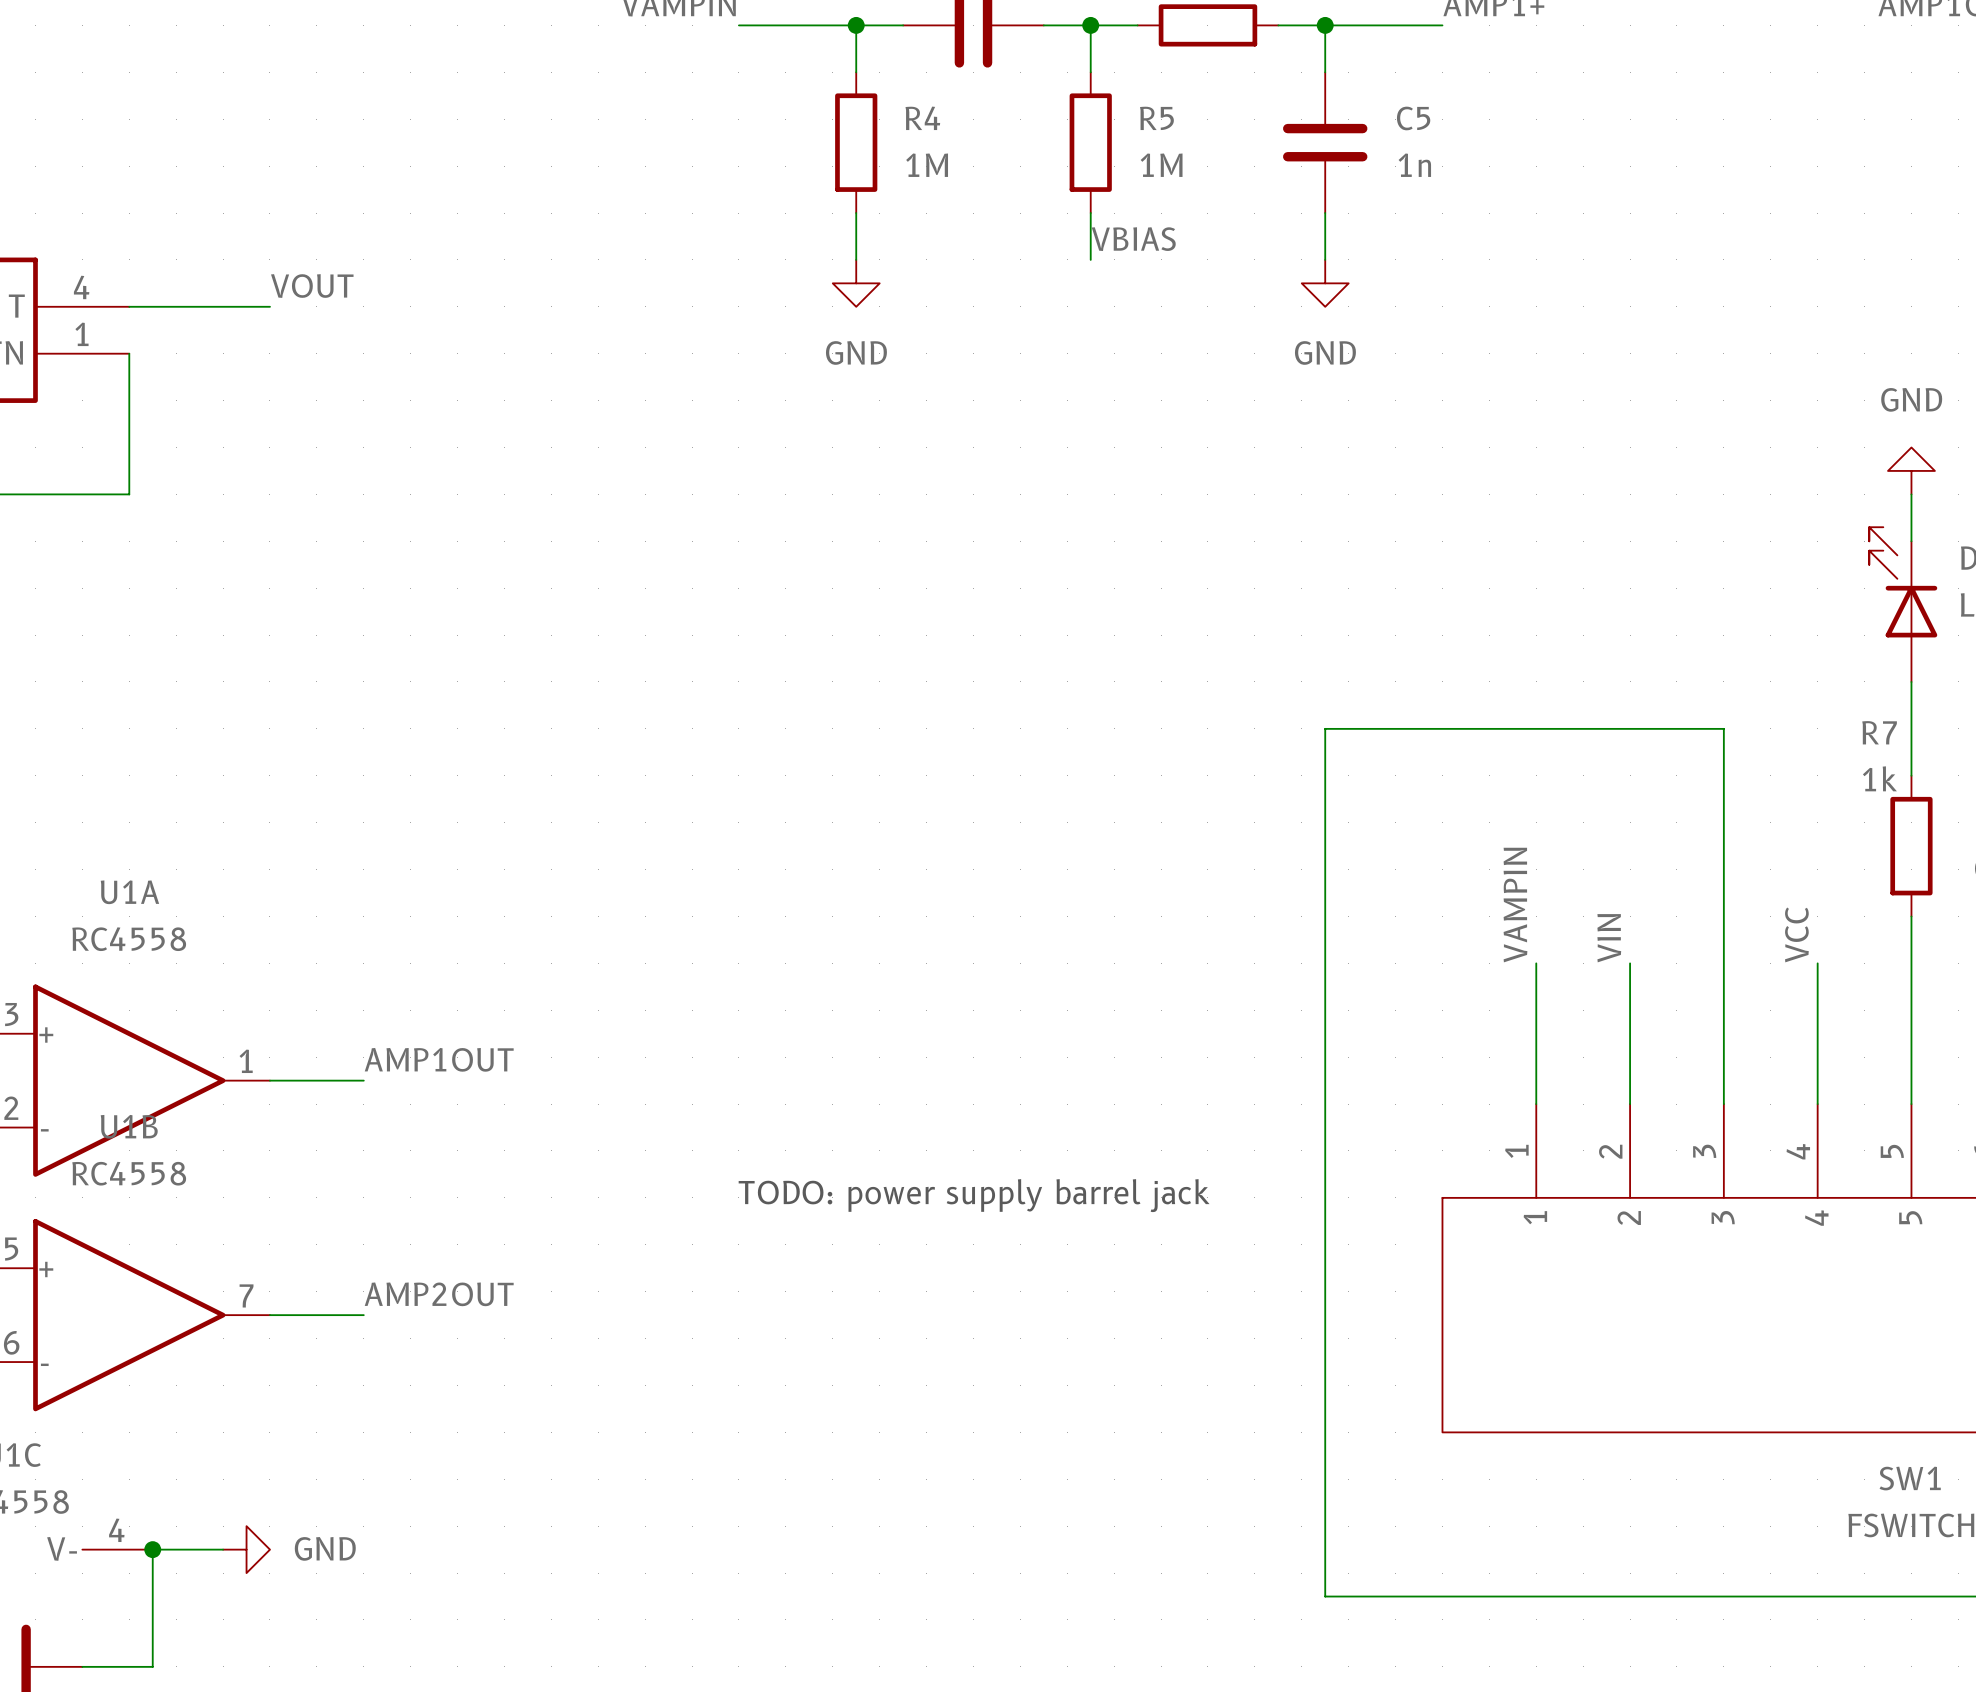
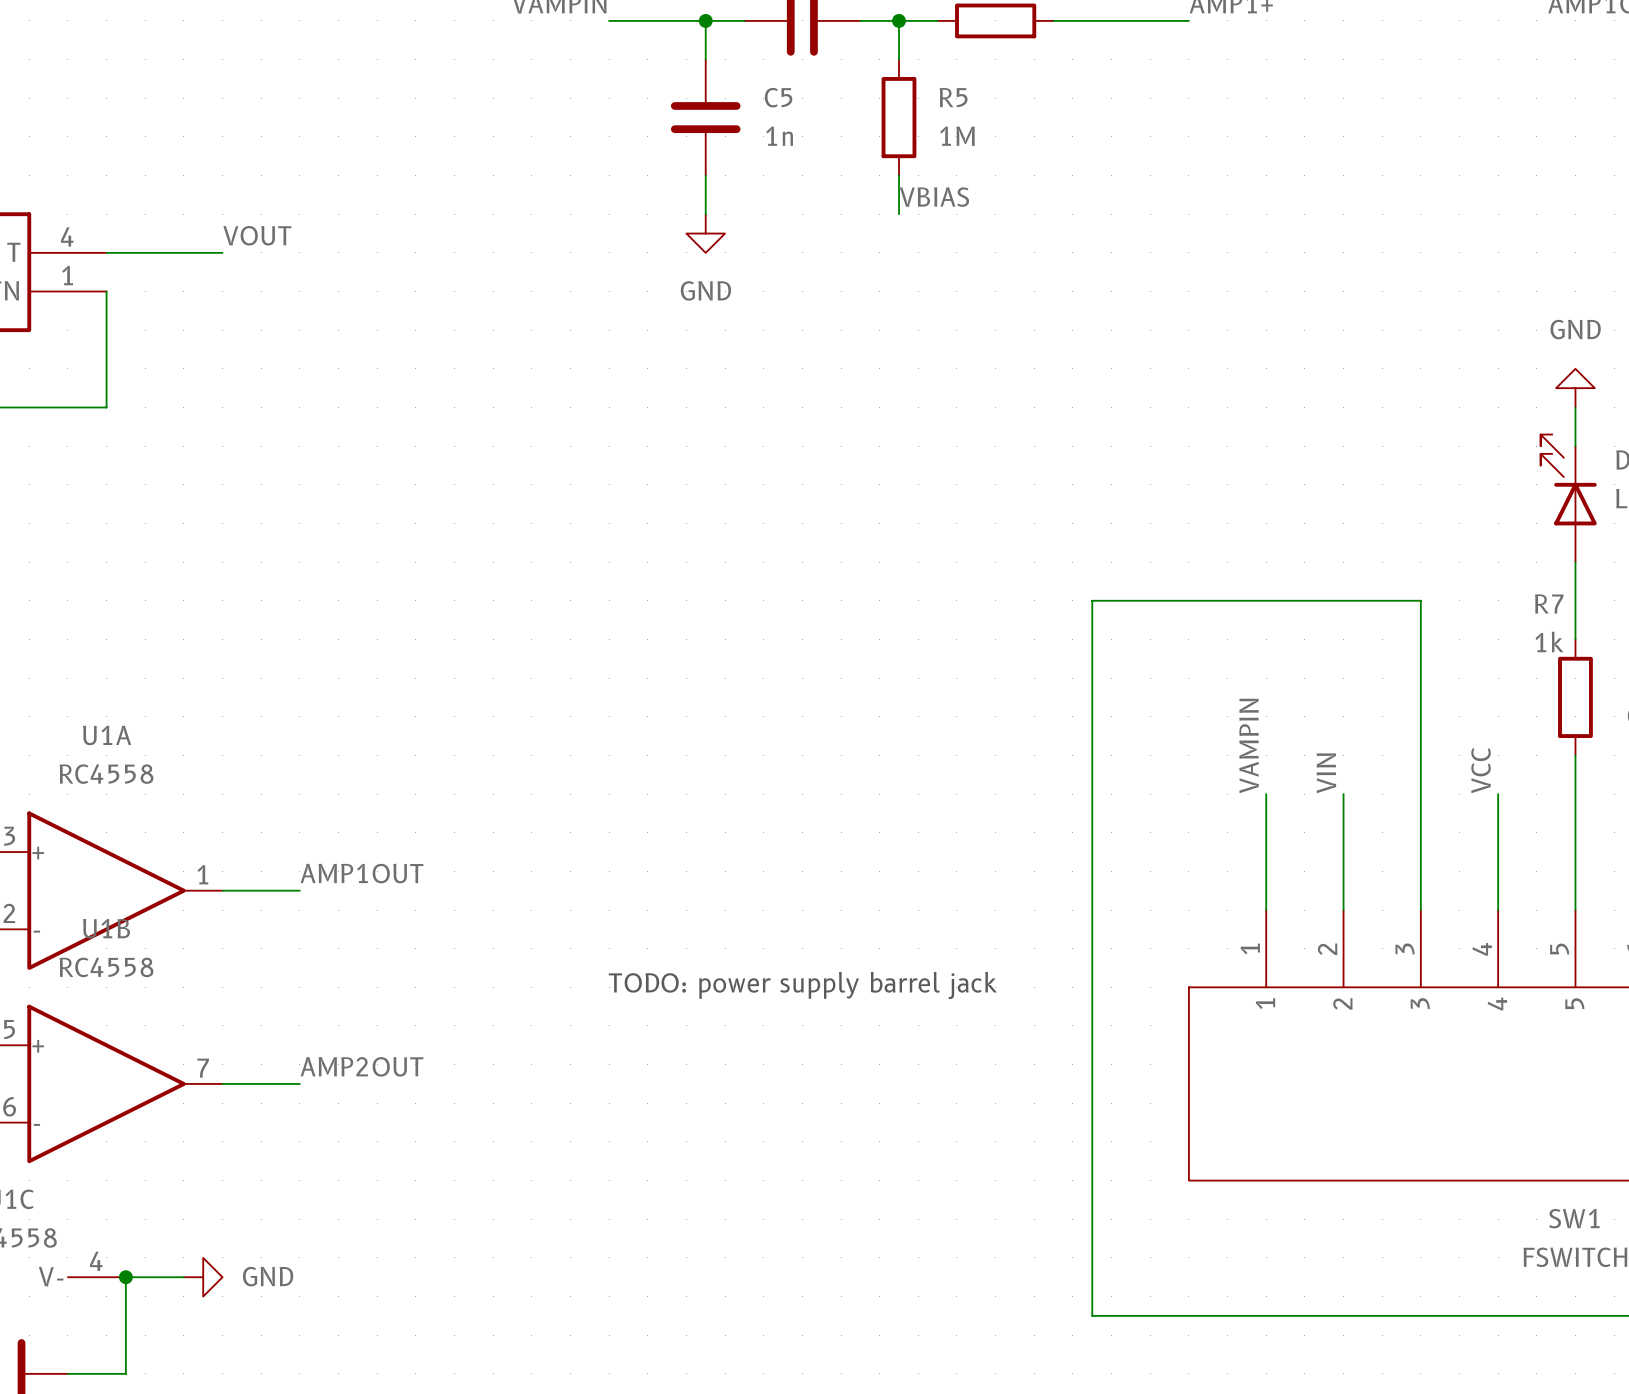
wire: (1325, 25) (1325, 72) -> none
junction: (1325, 25) -> none
R4: 1M (856, 142) -> none
C5 position: (1325, 142) -> (705, 117)
wire: (1325, 213) (1325, 259) -> none
power symbol: GND (1325, 283) -> none

